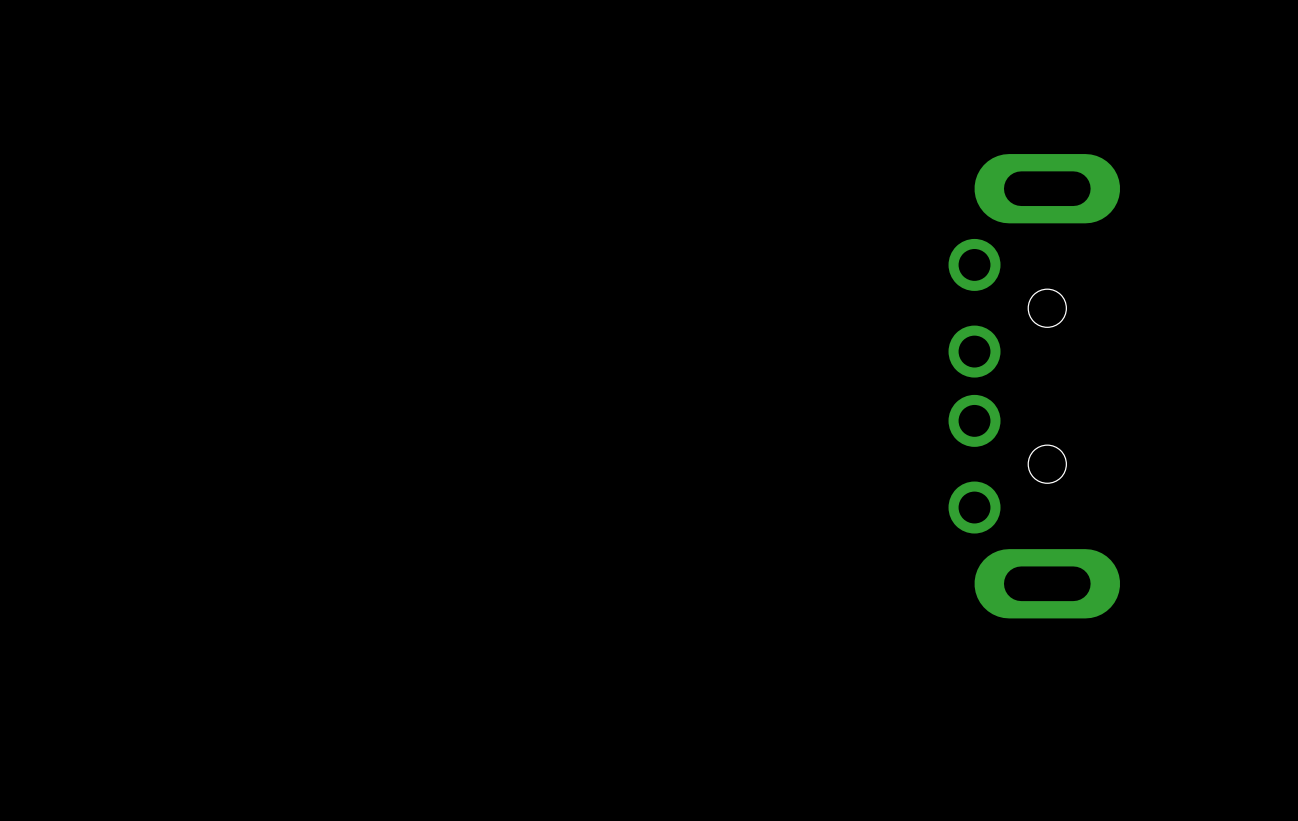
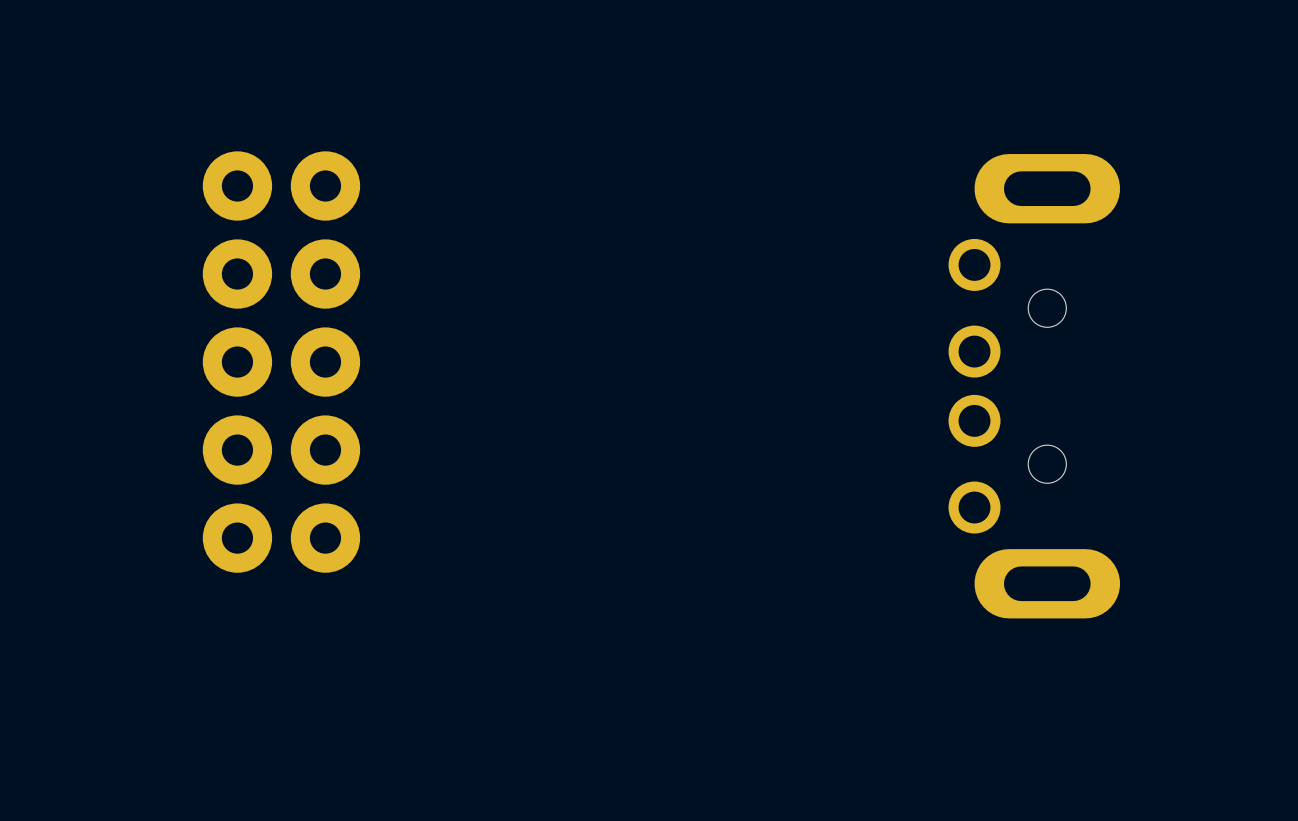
part: none -> (281, 362)

